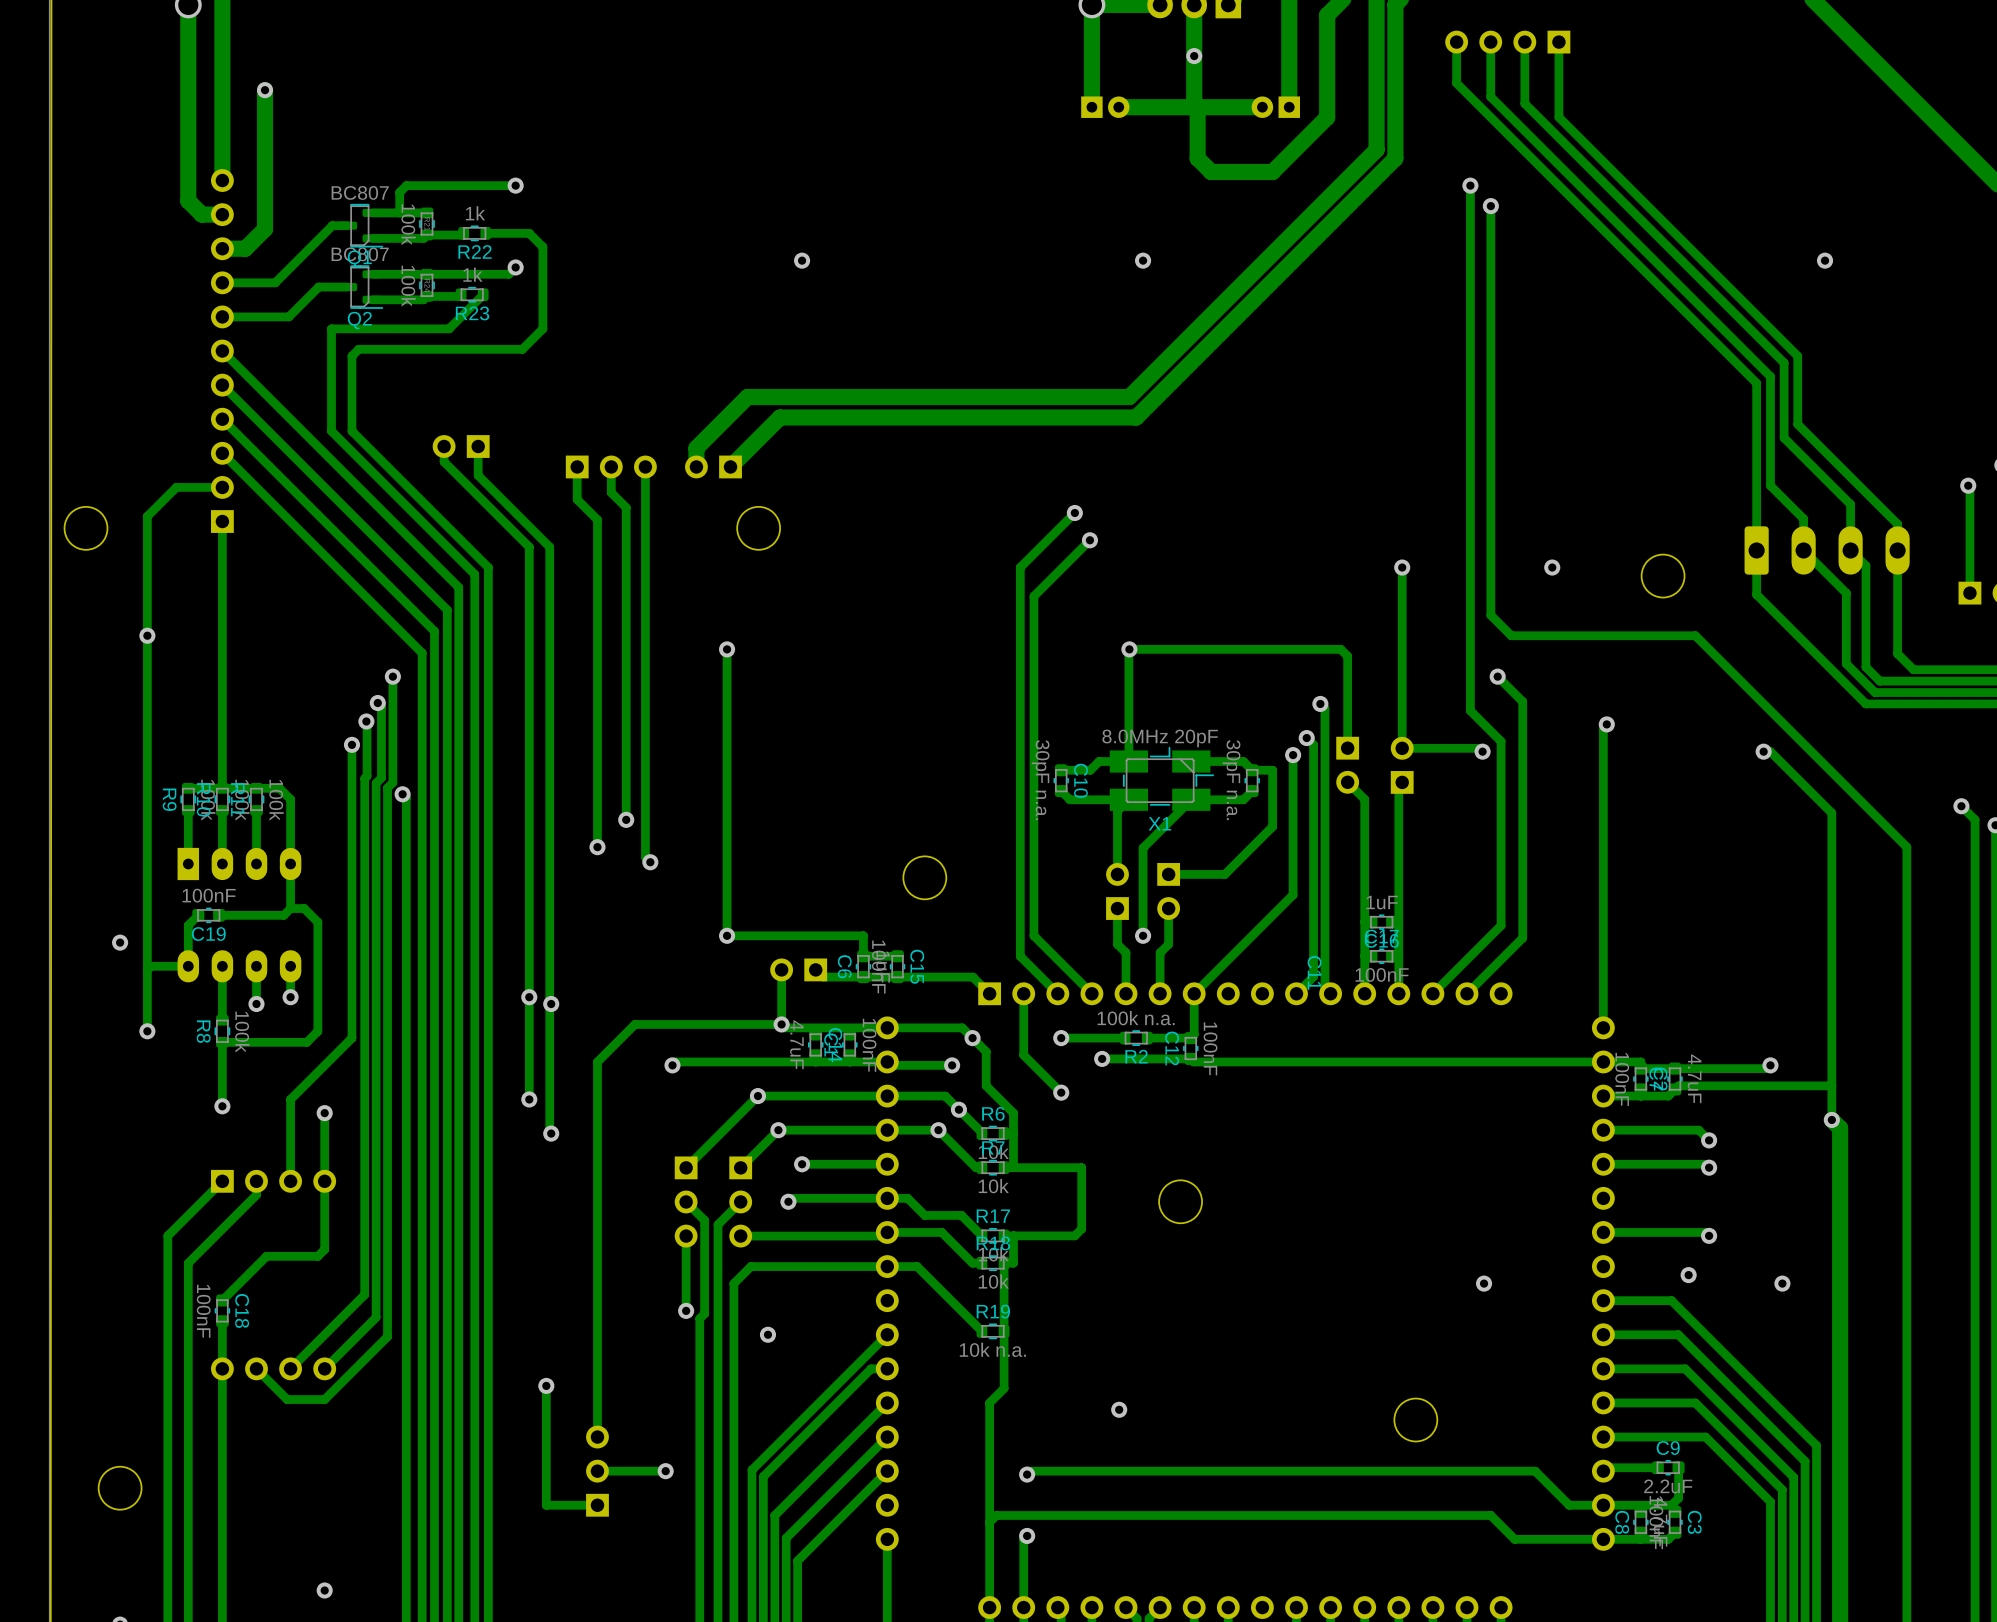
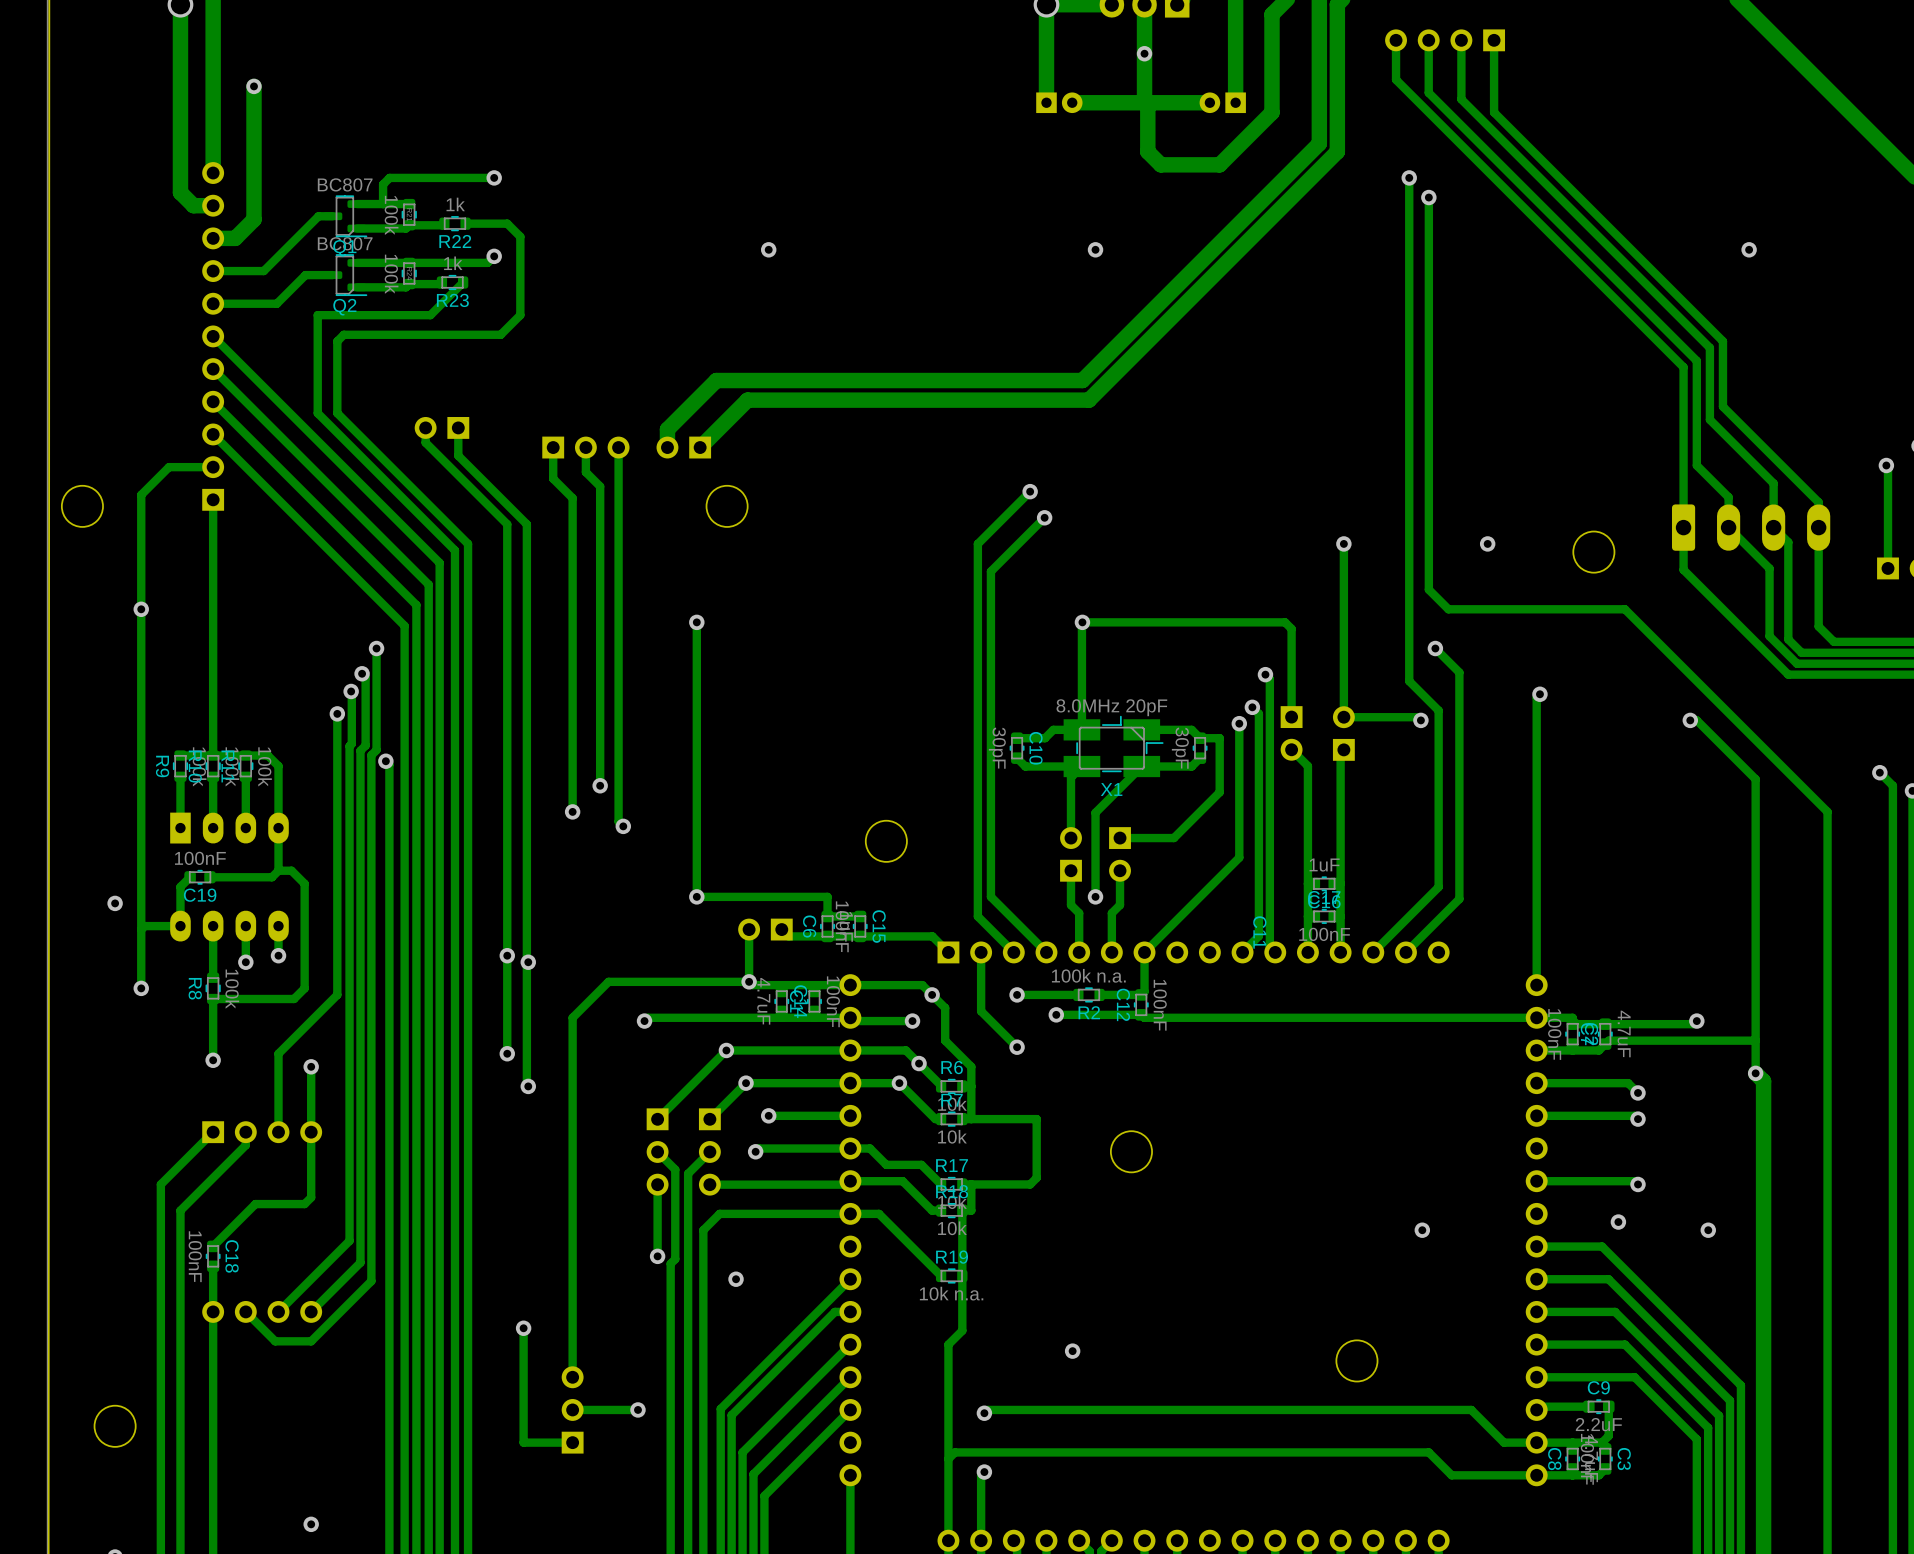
C10 value: 30pF n.a. (1040, 780) -> 30pF (997, 748)
C11 value: 30pF n.a. (1231, 780) -> 30pF (1180, 748)

